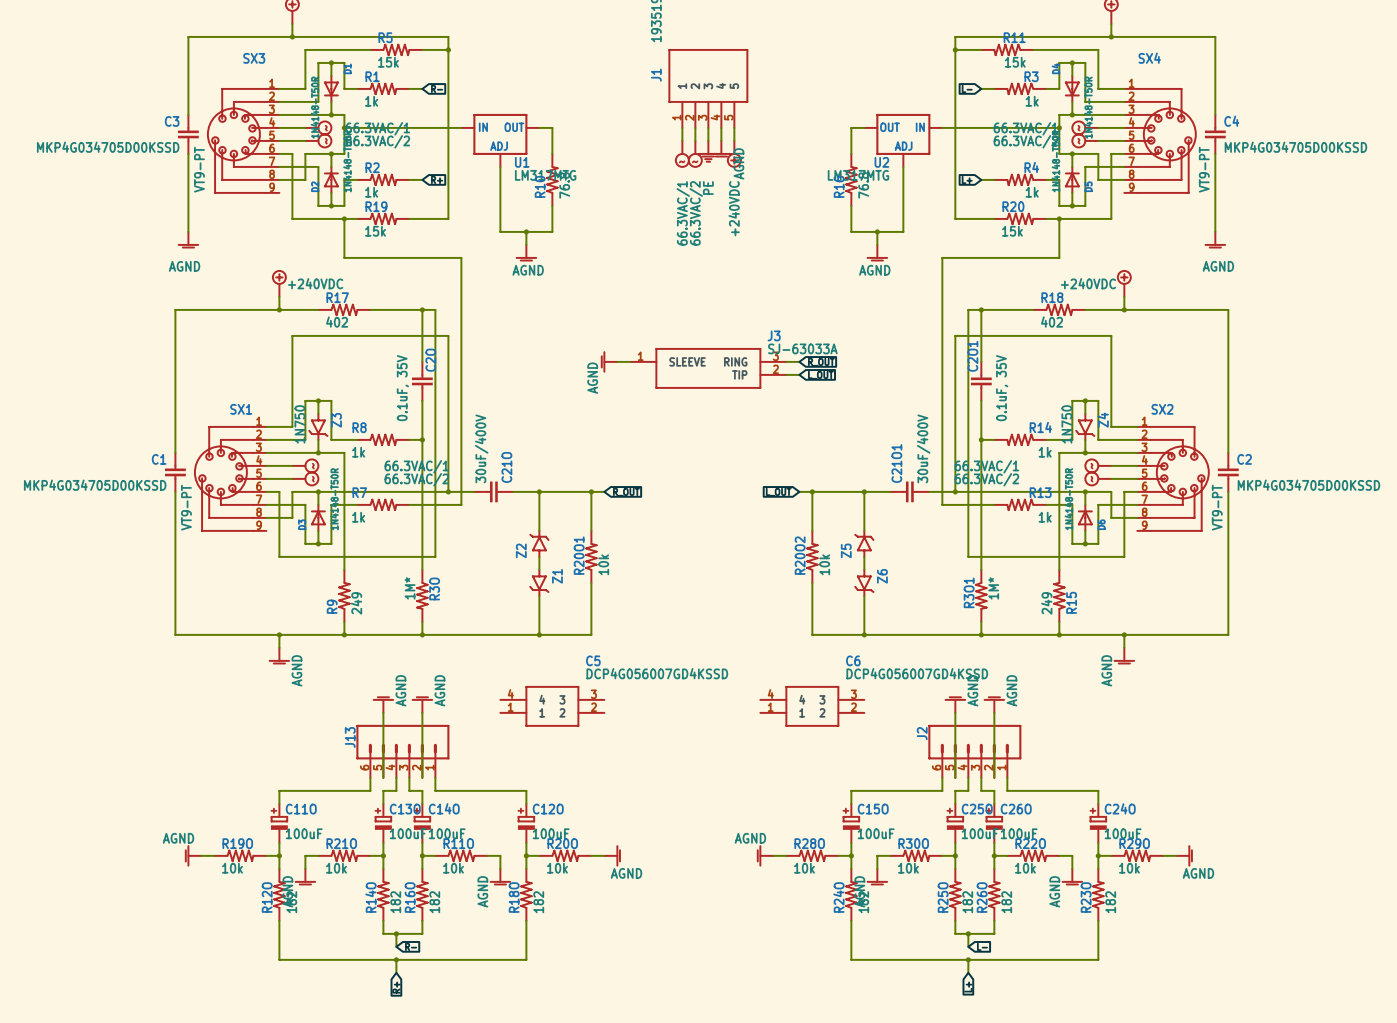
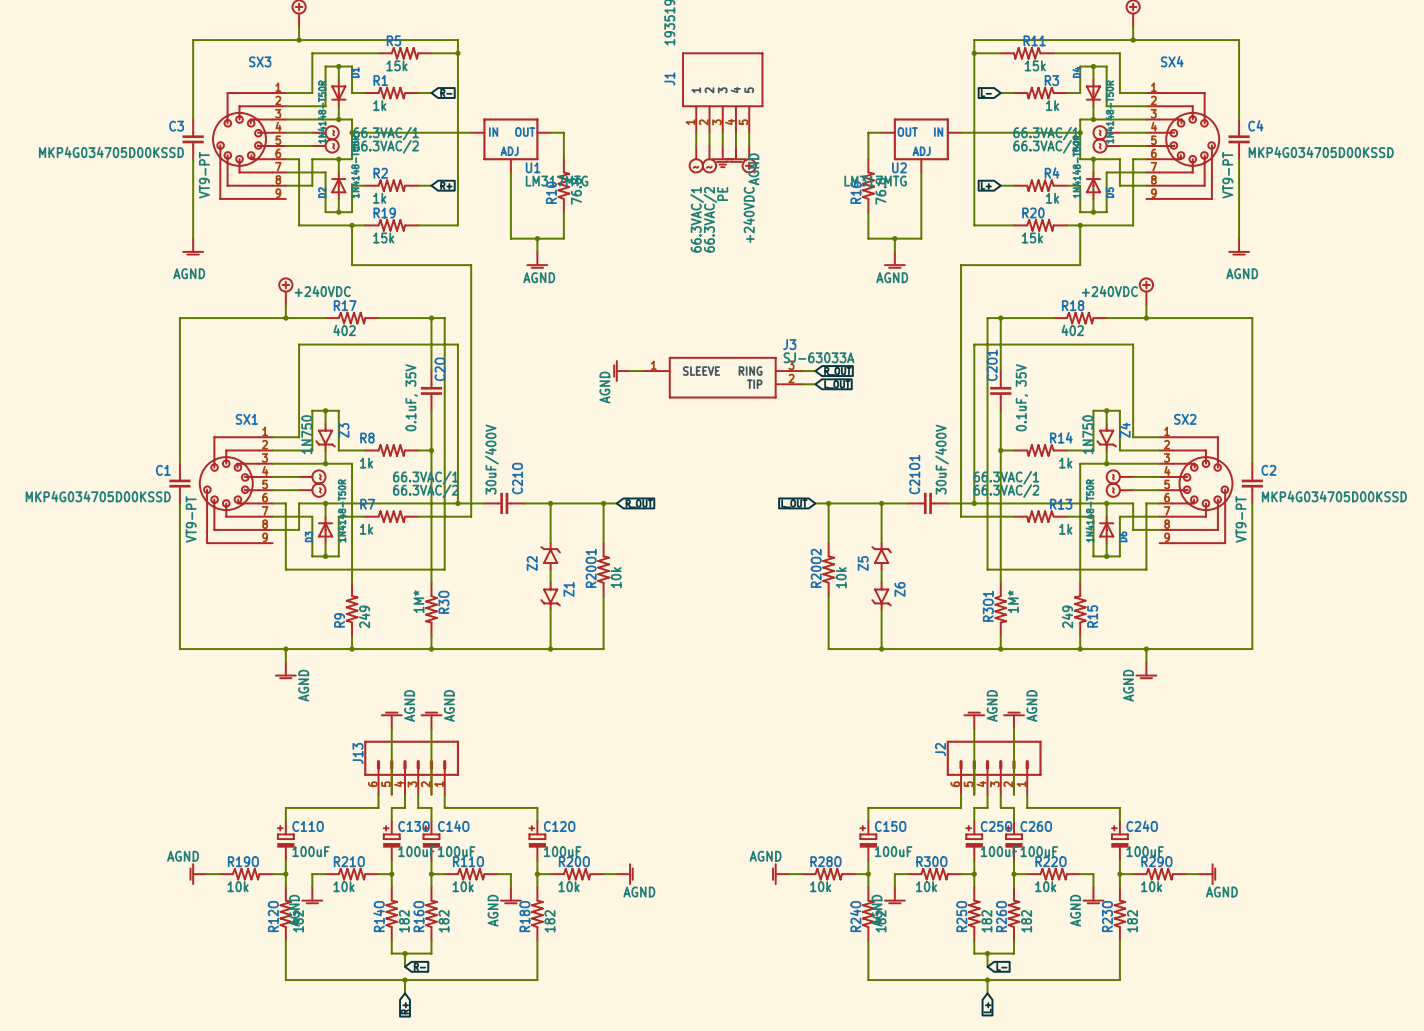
C5: DCP4G056007GD4KSSD (552, 706) -> none
C6: DCP4G056007GD4KSSD (812, 706) -> none

